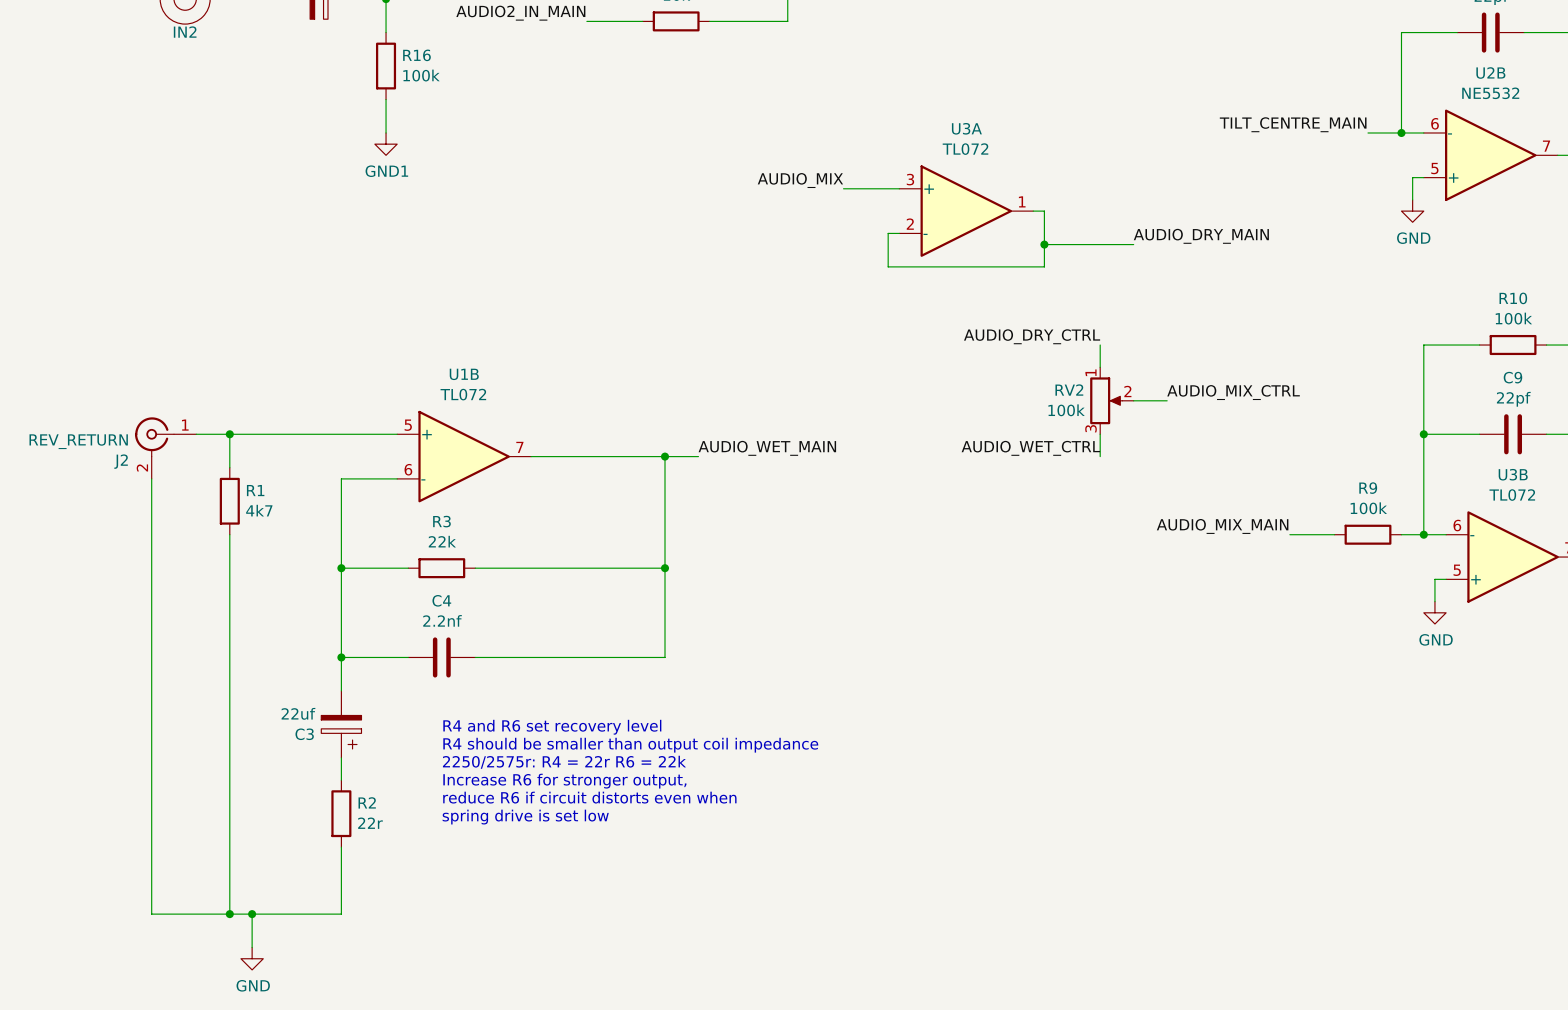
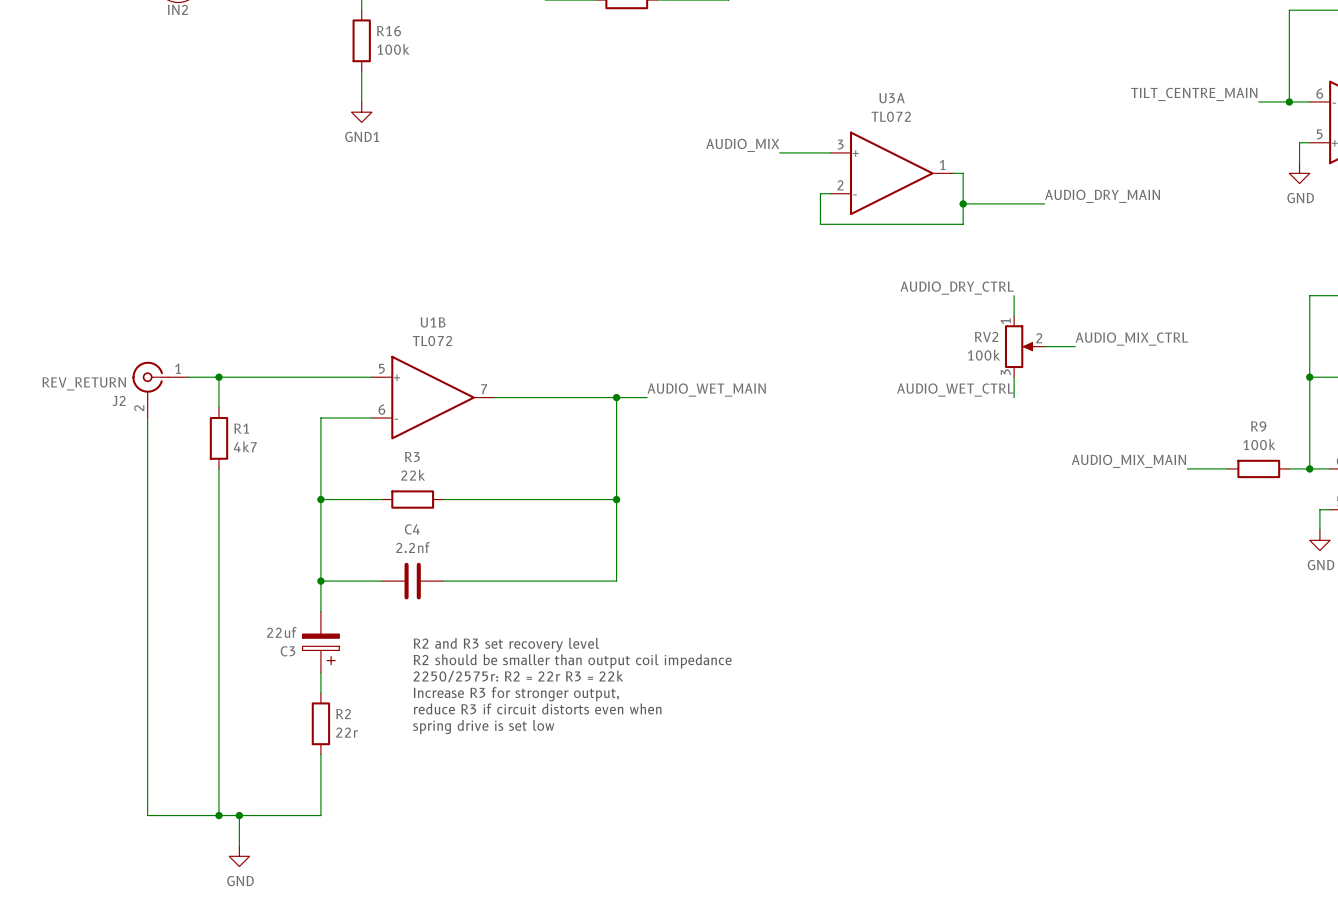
text: R4 and R6 set recovery level (552, 727) -> R2 and R3 set recovery level (506, 644)
text: R4 should be smaller than output coil impedance (630, 745) -> R2 should be smaller than output coil impedance (572, 661)
text: 2250/2575r: R4 = 22r R6 = 22k (564, 762) -> 2250/2575r: R2 = 22r R3 = 22k (518, 676)
text: Increase R6 for stronger output, (564, 781) -> Increase R3 for stronger output, (516, 694)
text: reduce R6 if circuit distorts even when (589, 797) -> reduce R3 if circuit distorts even when (537, 708)

